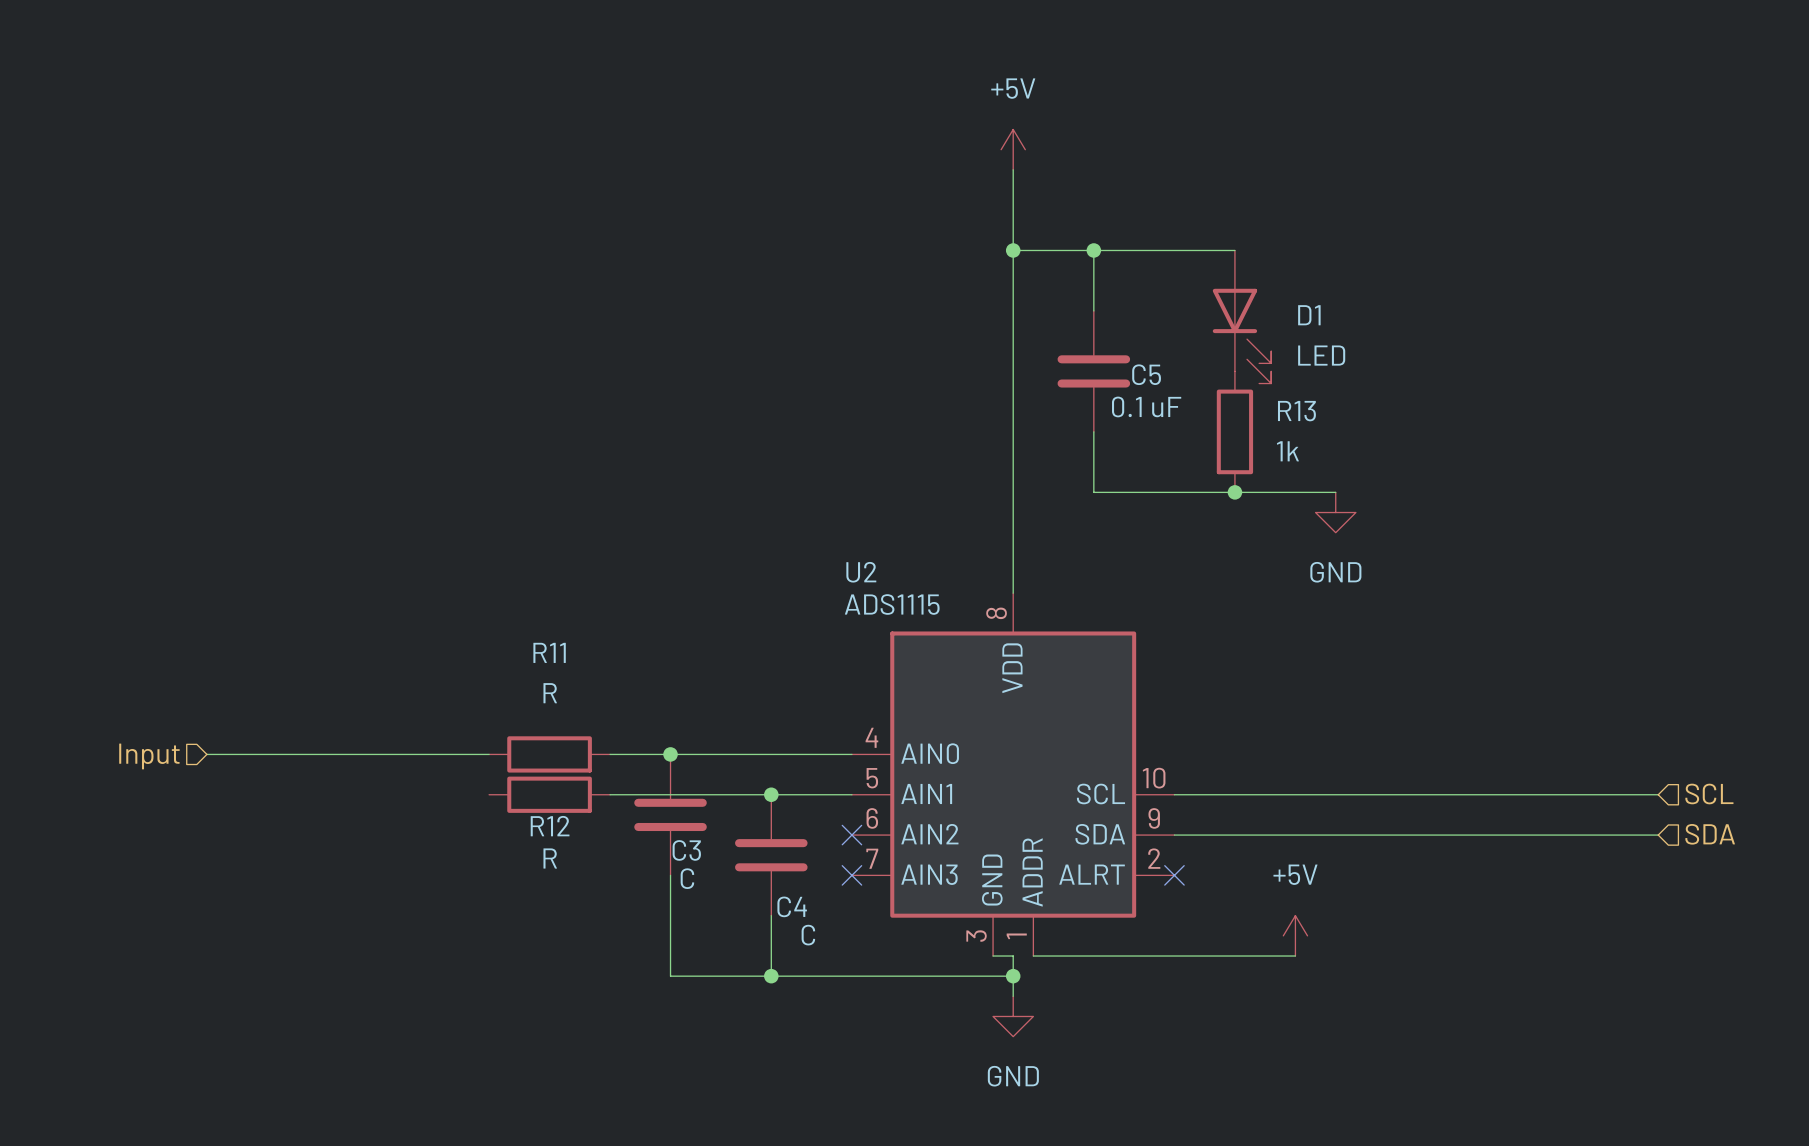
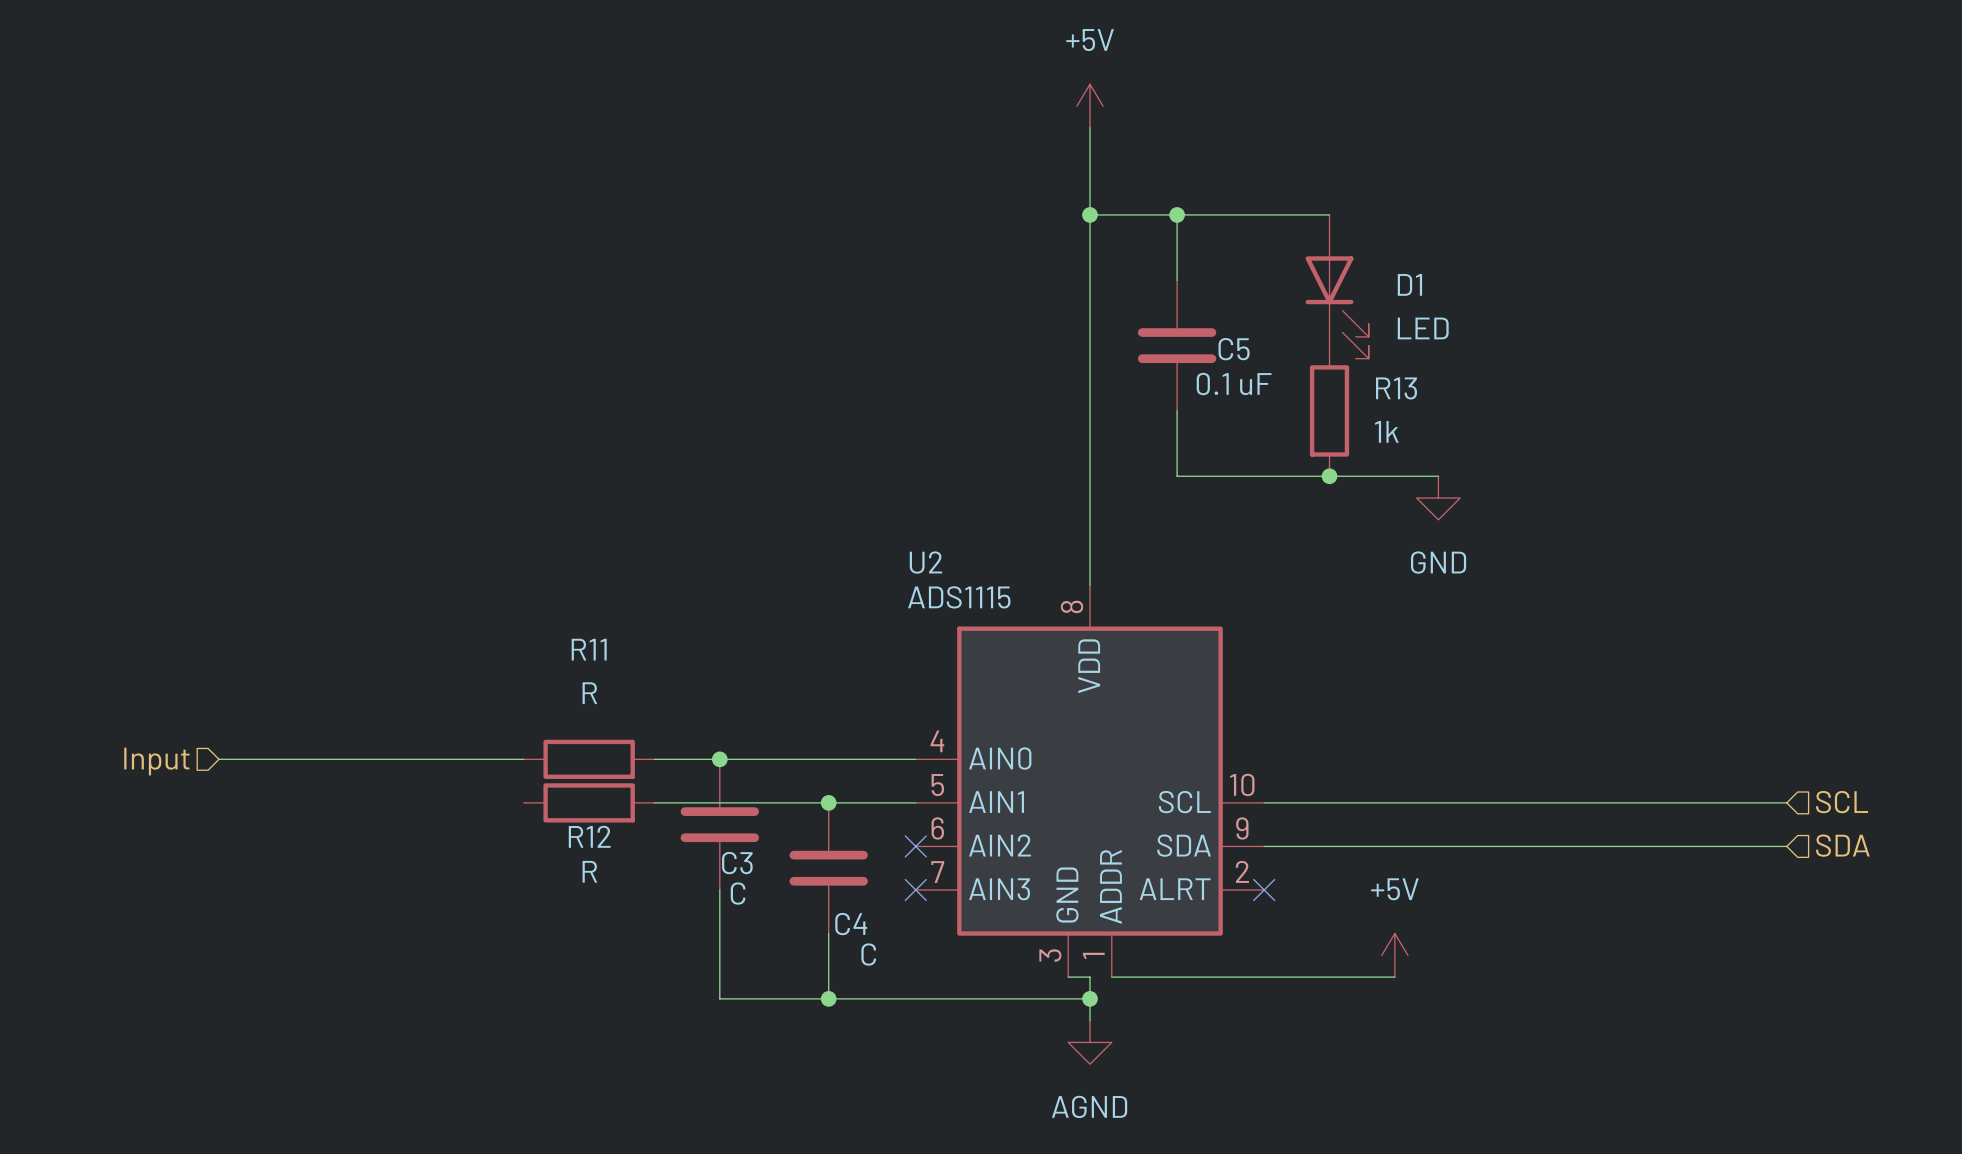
power symbol: GND (1013, 1016) -> AGND (1090, 1042)

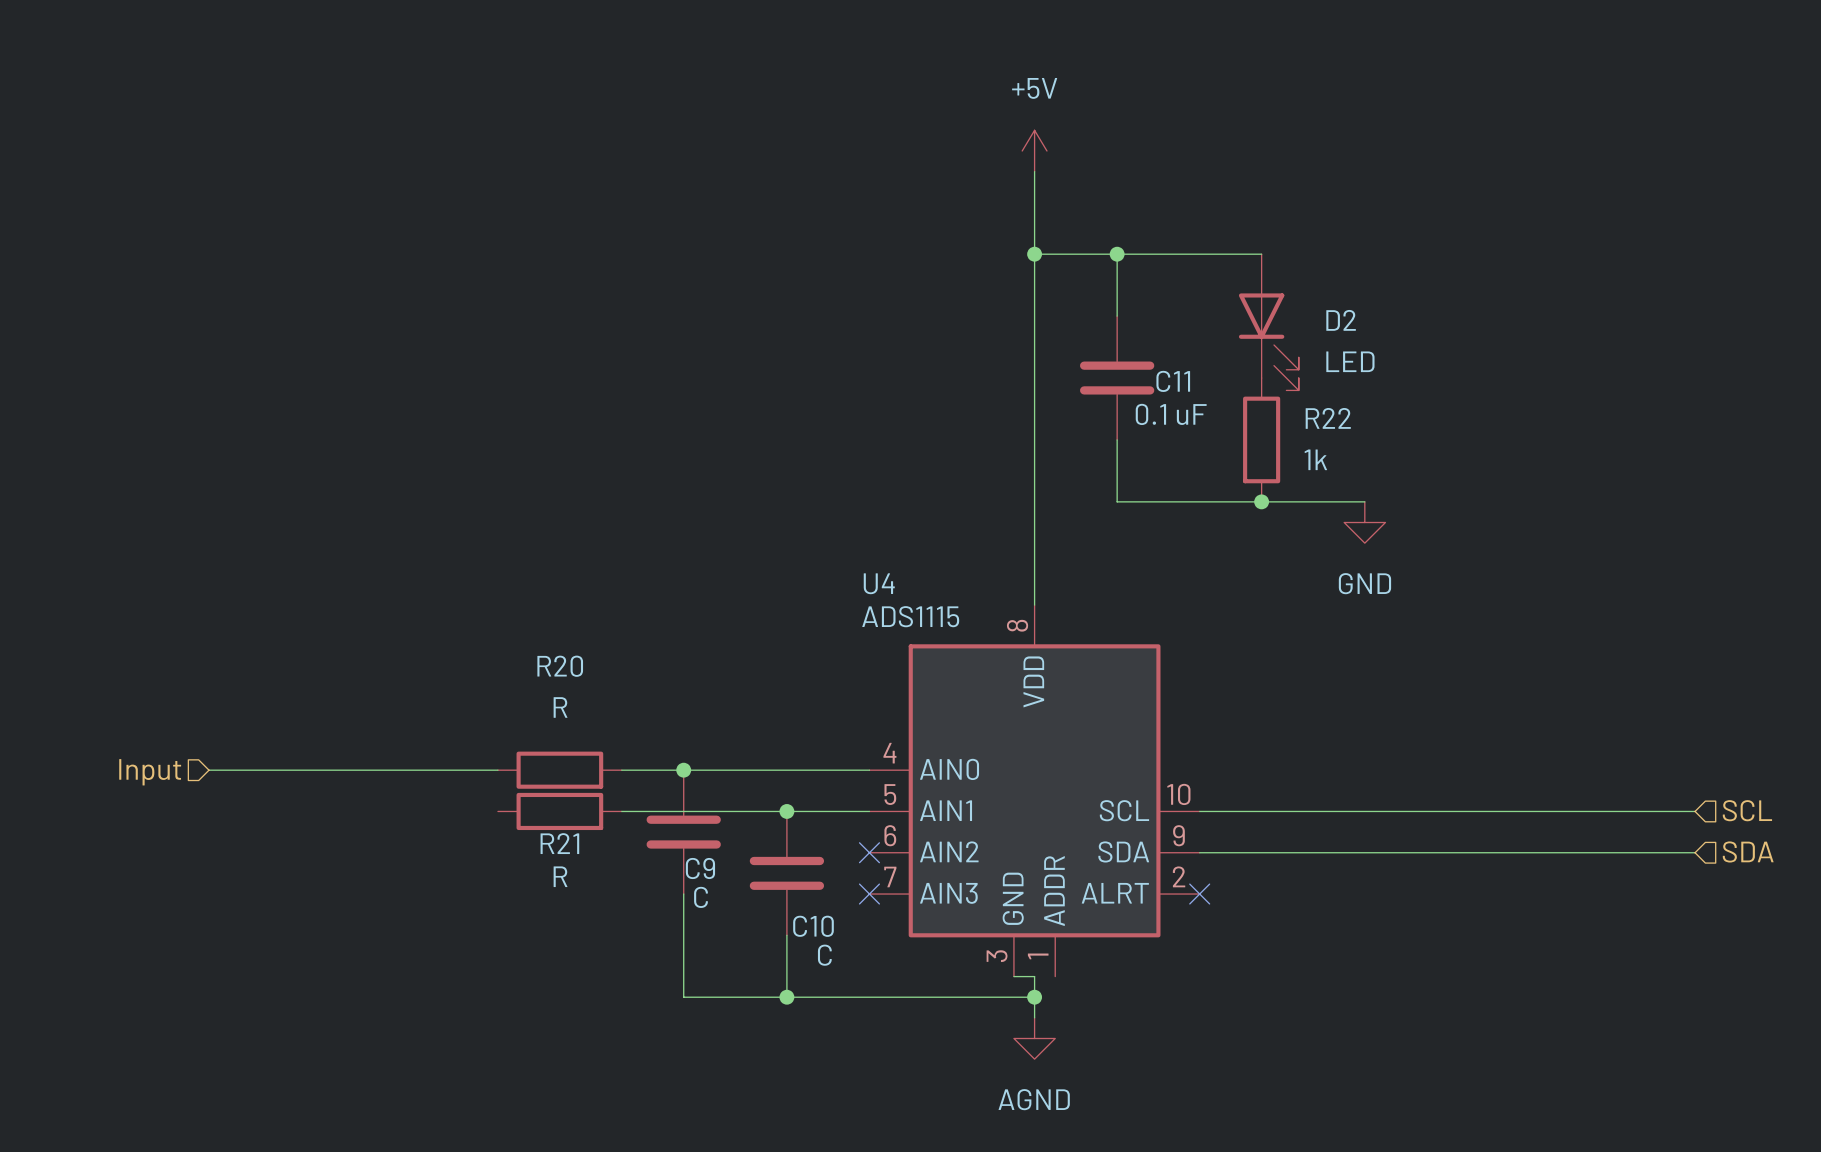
D1 name: D1 (1409, 284) -> D2 (1341, 320)
C5 name: C5 (1234, 349) -> C11 (1173, 381)
R13 name: R13 (1396, 388) -> R22 (1328, 418)
U2 name: U2 (925, 562) -> U4 (879, 583)
R11 name: R11 (589, 649) -> R20 (560, 666)
R12 name: R12 (589, 836) -> R21 (559, 843)
C3 name: C3 (737, 863) -> C9 (700, 868)
C4 name: C4 (851, 924) -> C10 (813, 926)
power symbol: +5V (1394, 955) -> none
wire: (1111, 977) (1394, 977) -> none

